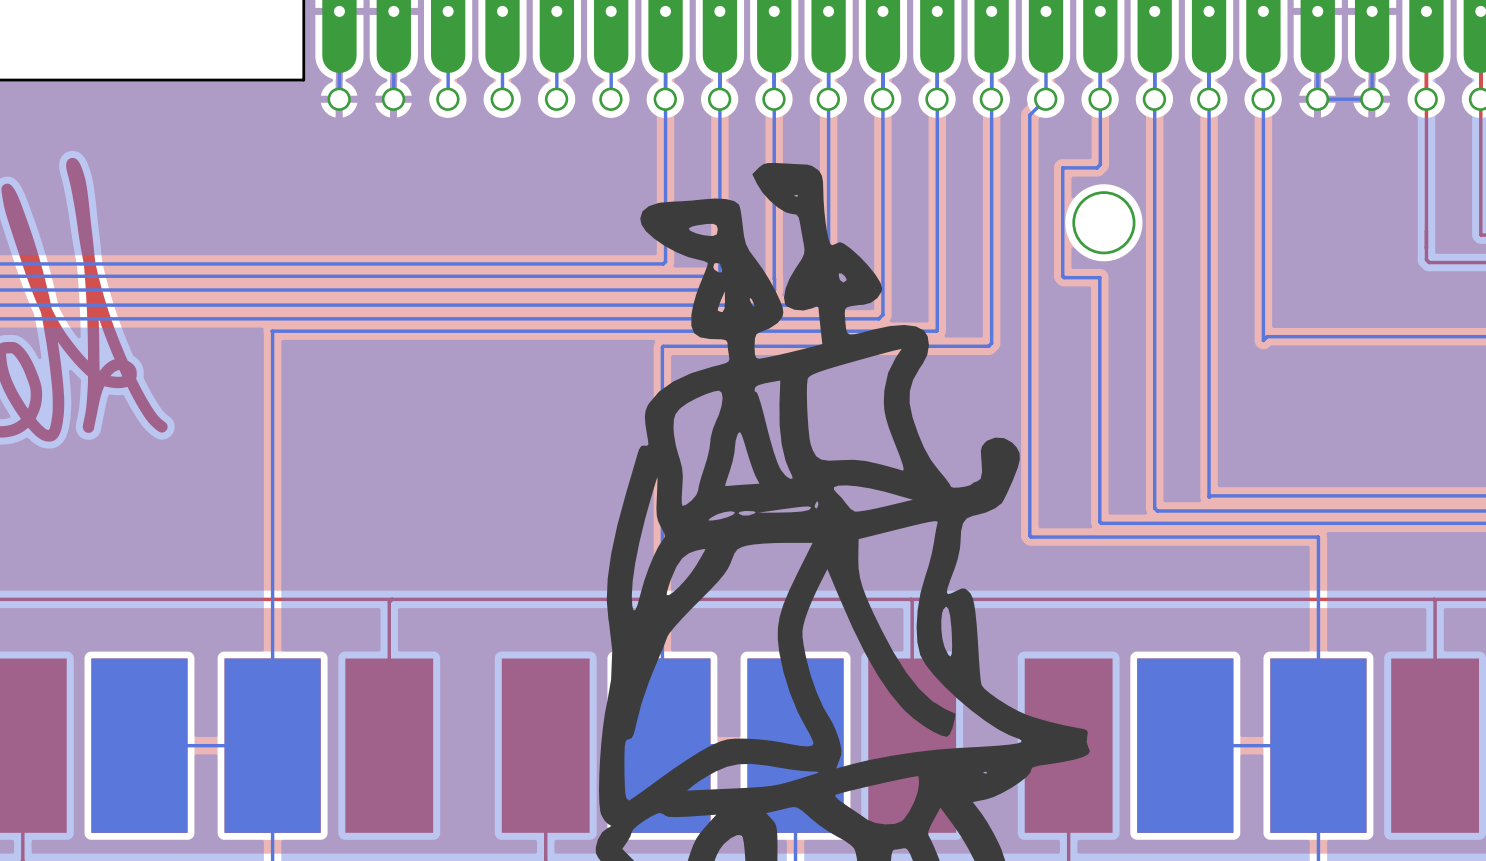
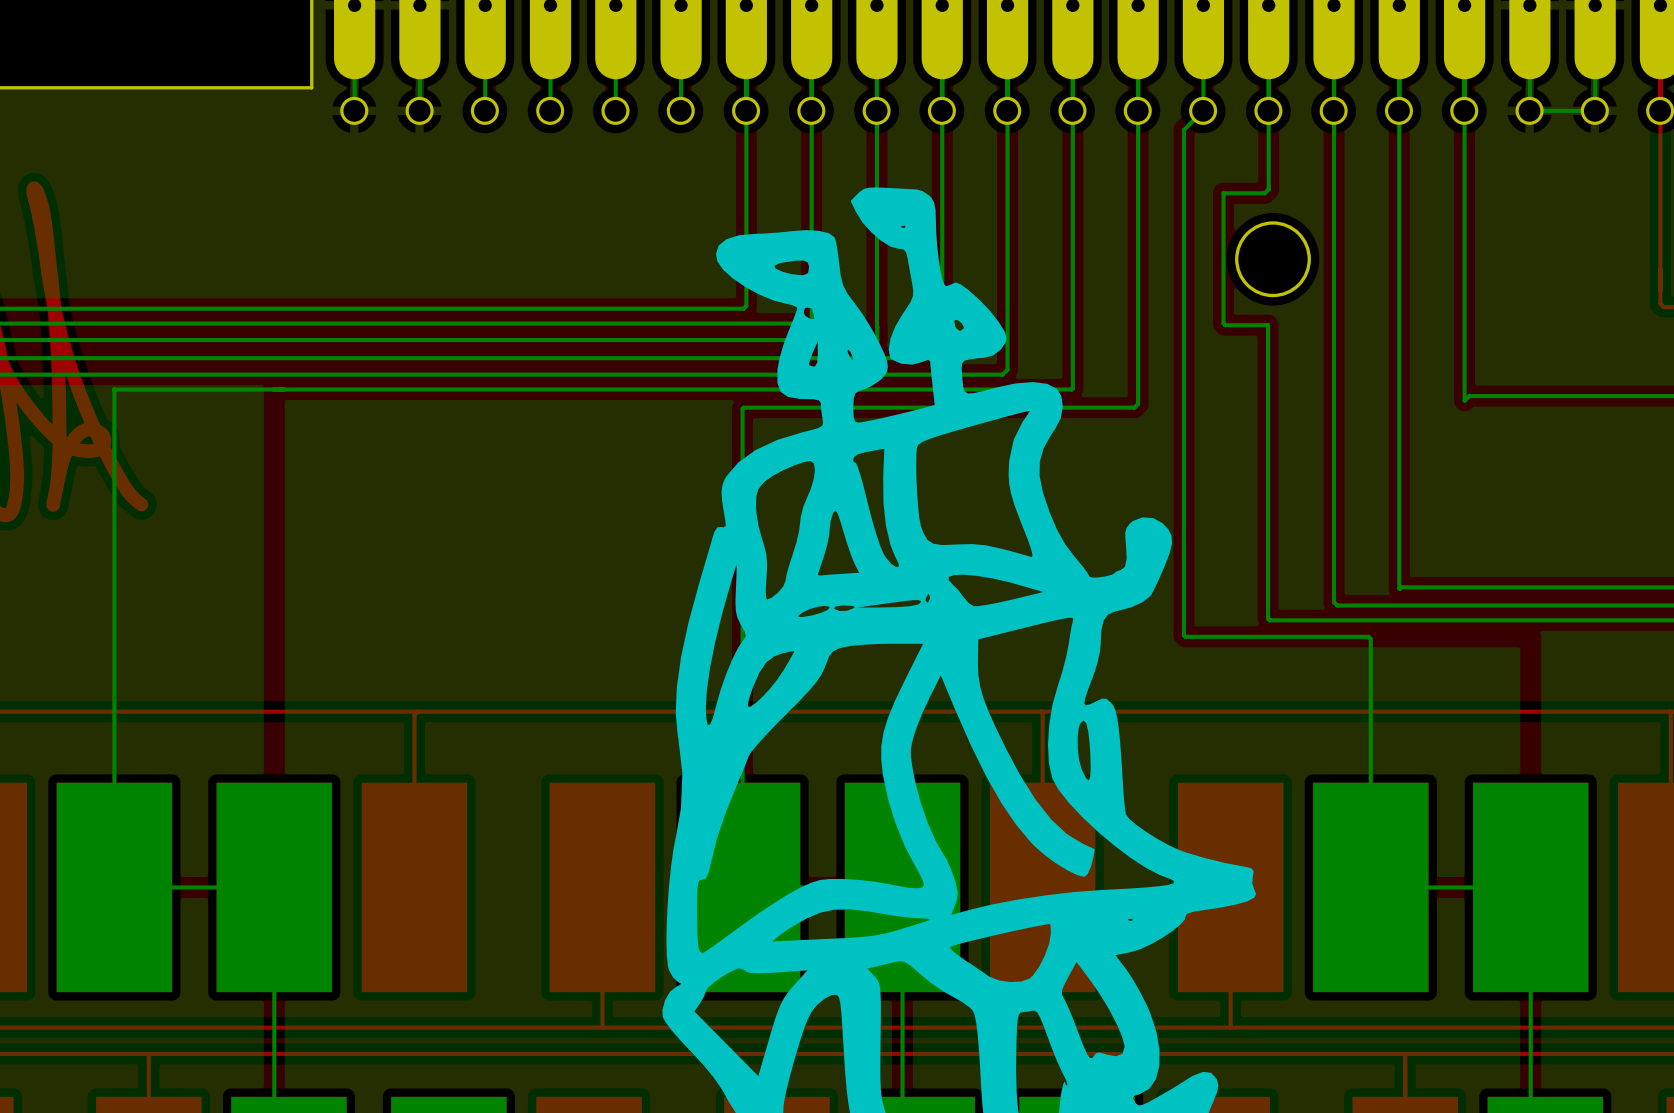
bottom track: (272, 331) (272, 745) -> none
bottom track: none -> (273, 389) (113, 389) (114, 887)
bottom track: (1183, 537) (1318, 537) (1318, 745) -> (1368, 636) (1370, 638) (1370, 887)

